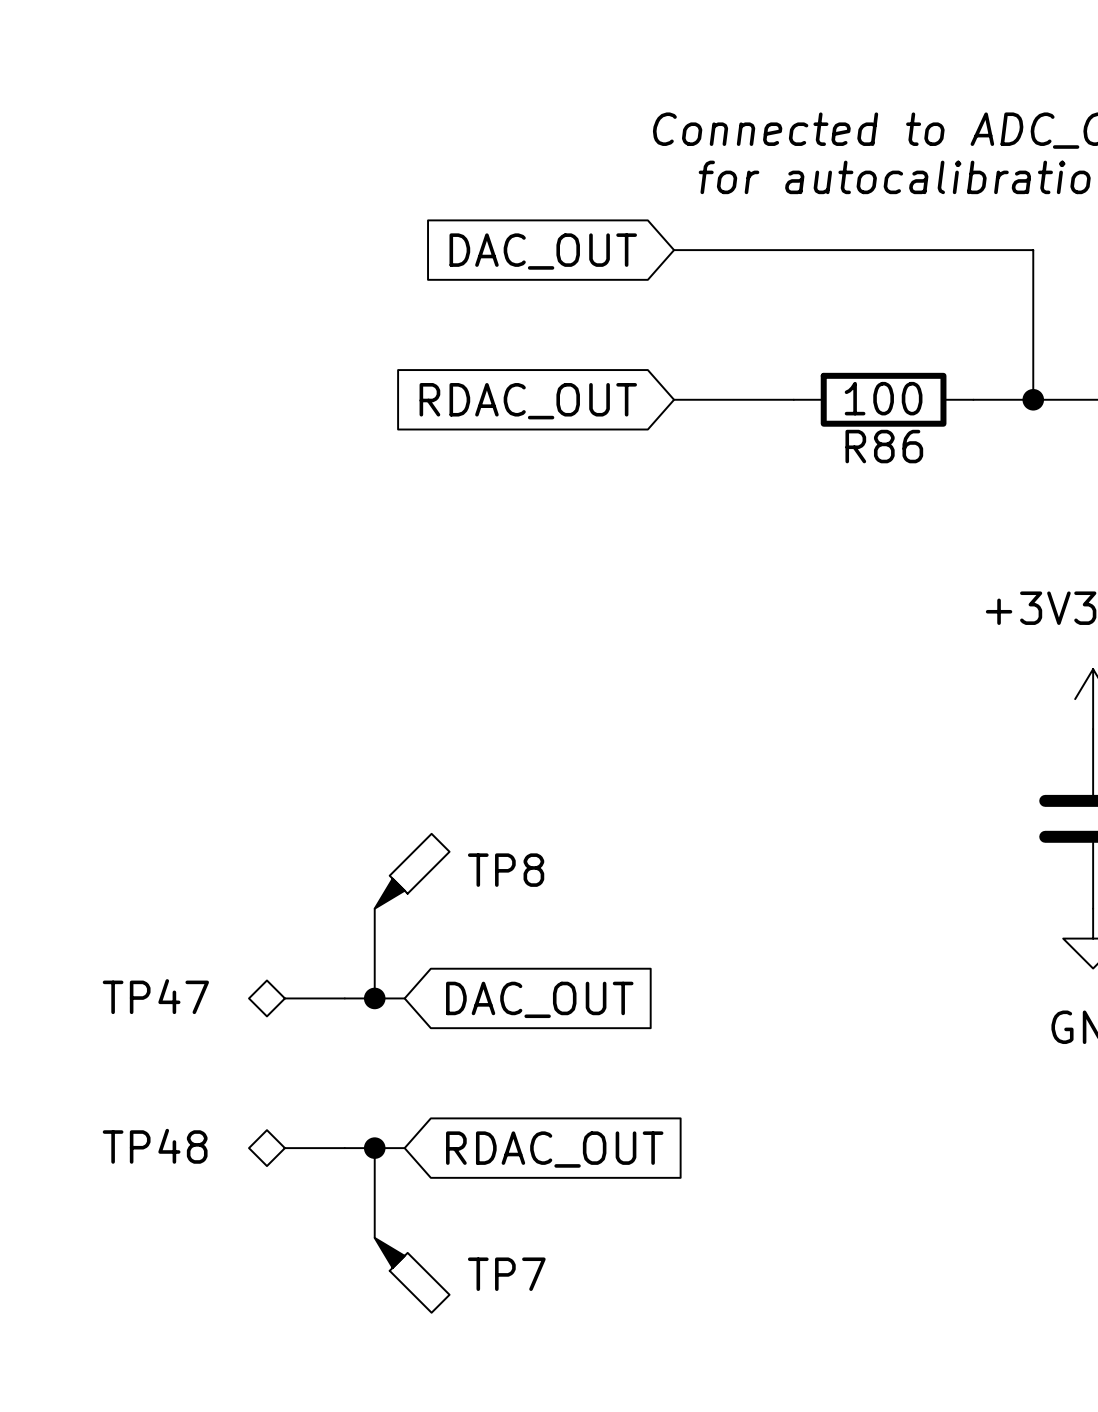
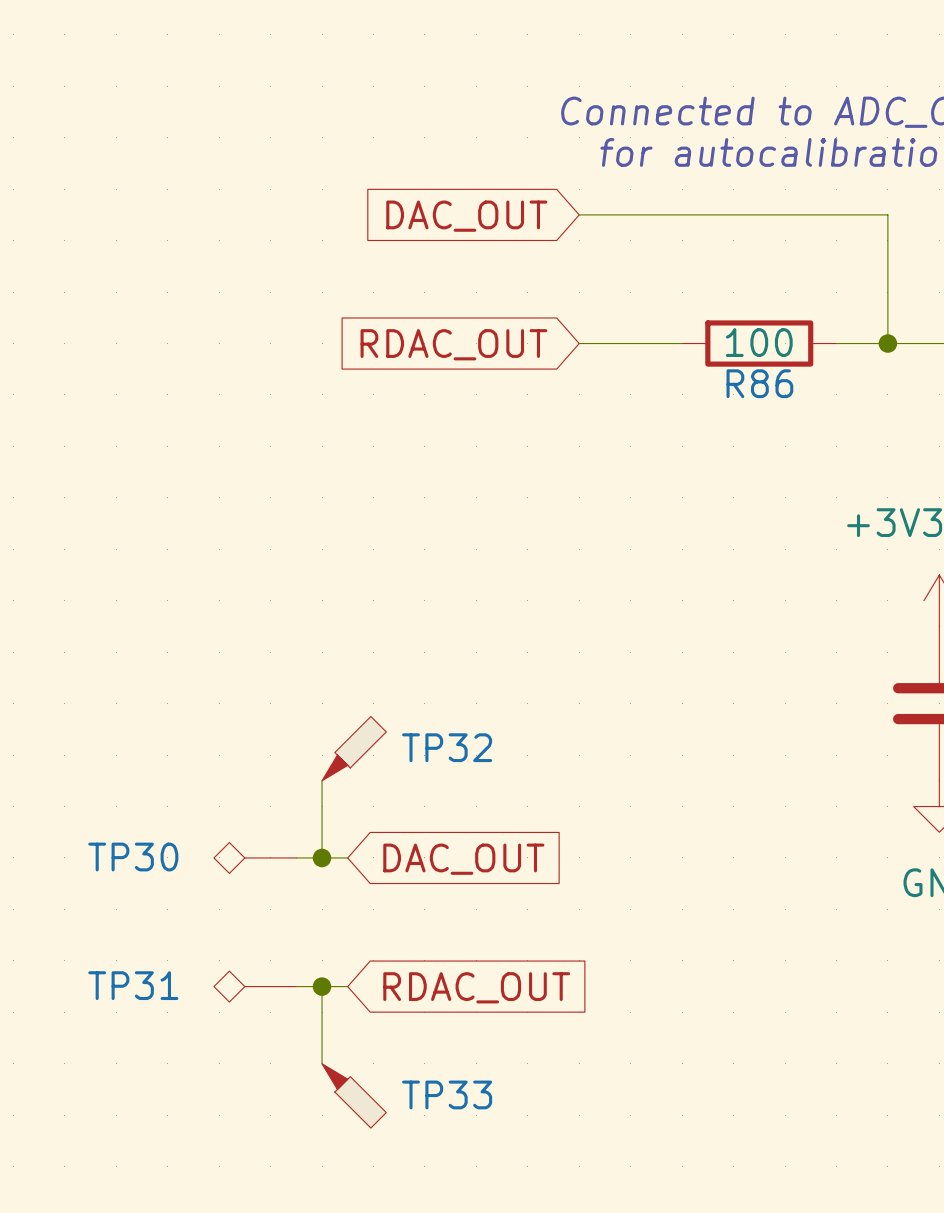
TP8 name: TP8 (506, 870) -> TP32 (447, 747)
TP47 name: TP47 (155, 996) -> TP30 (133, 857)
TP48 name: TP48 (155, 1146) -> TP31 (133, 985)
TP7 name: TP7 (506, 1274) -> TP33 (447, 1094)

